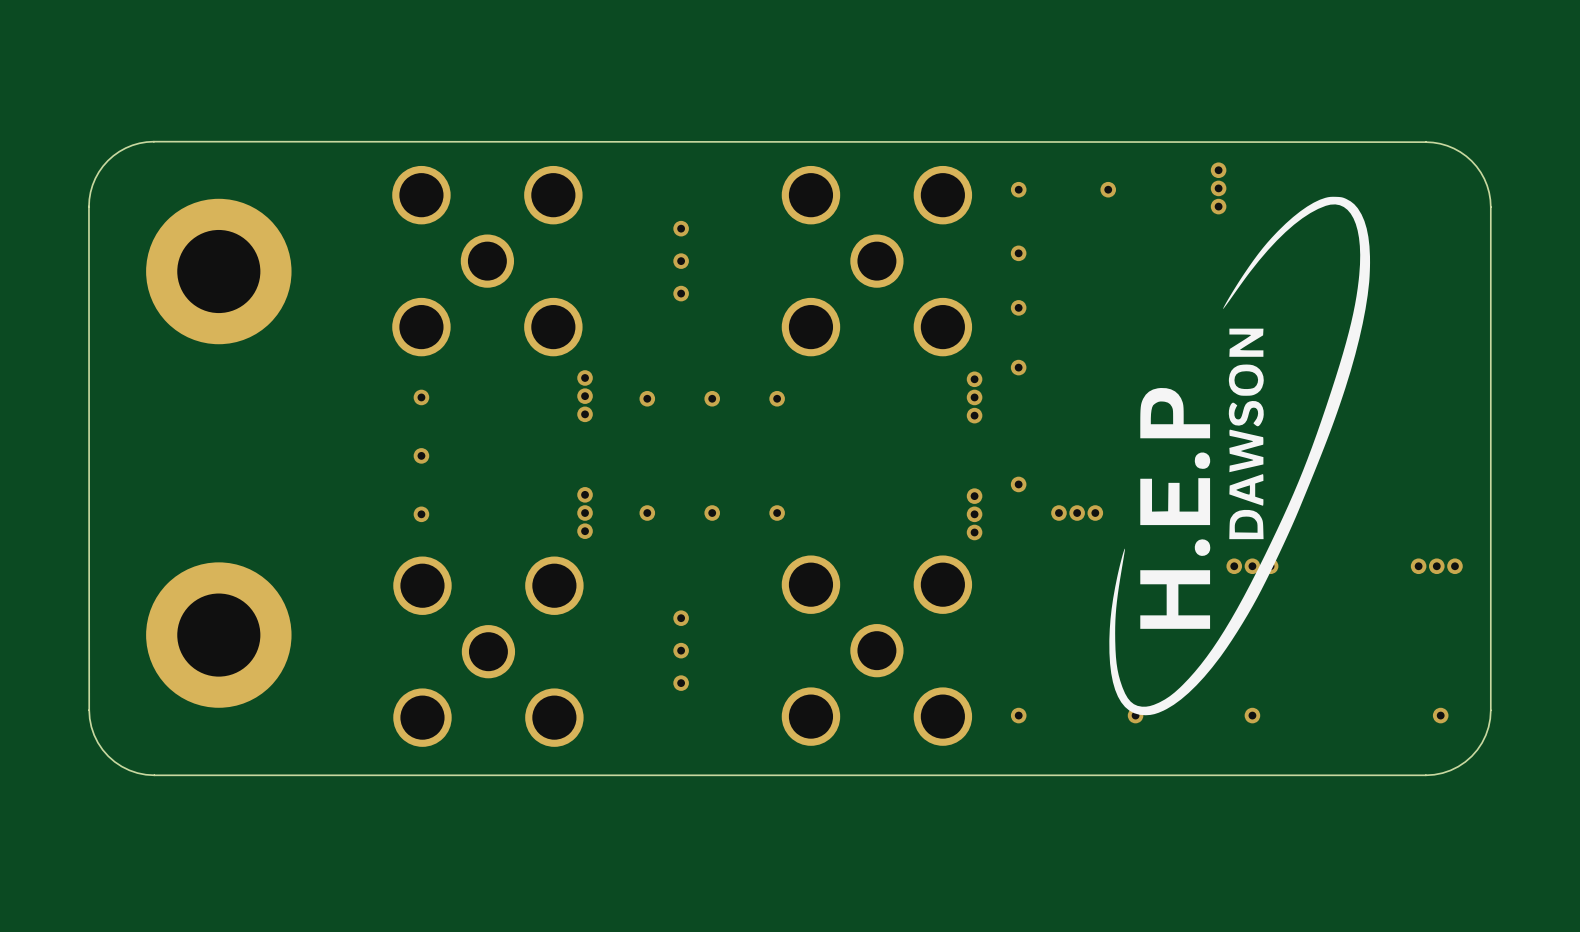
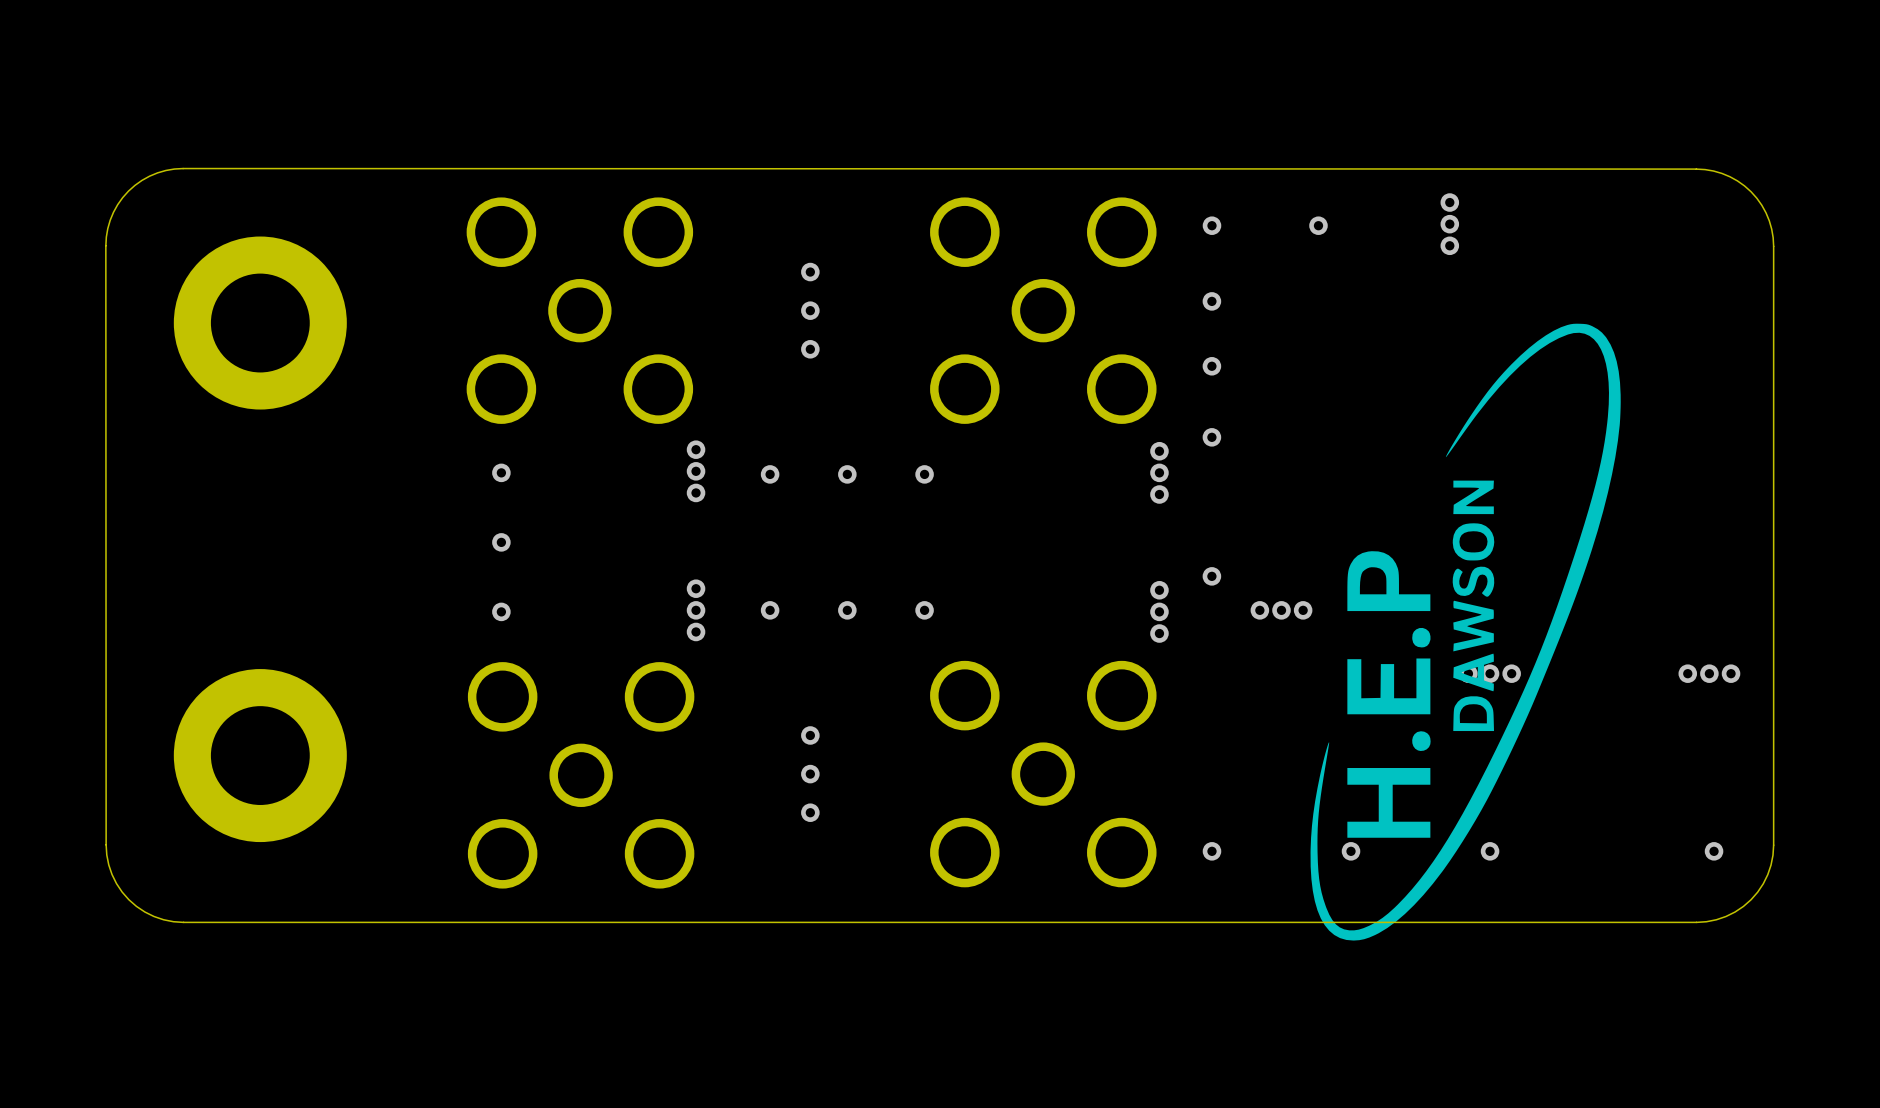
drawing position: (1239, 456) -> (1465, 632)

